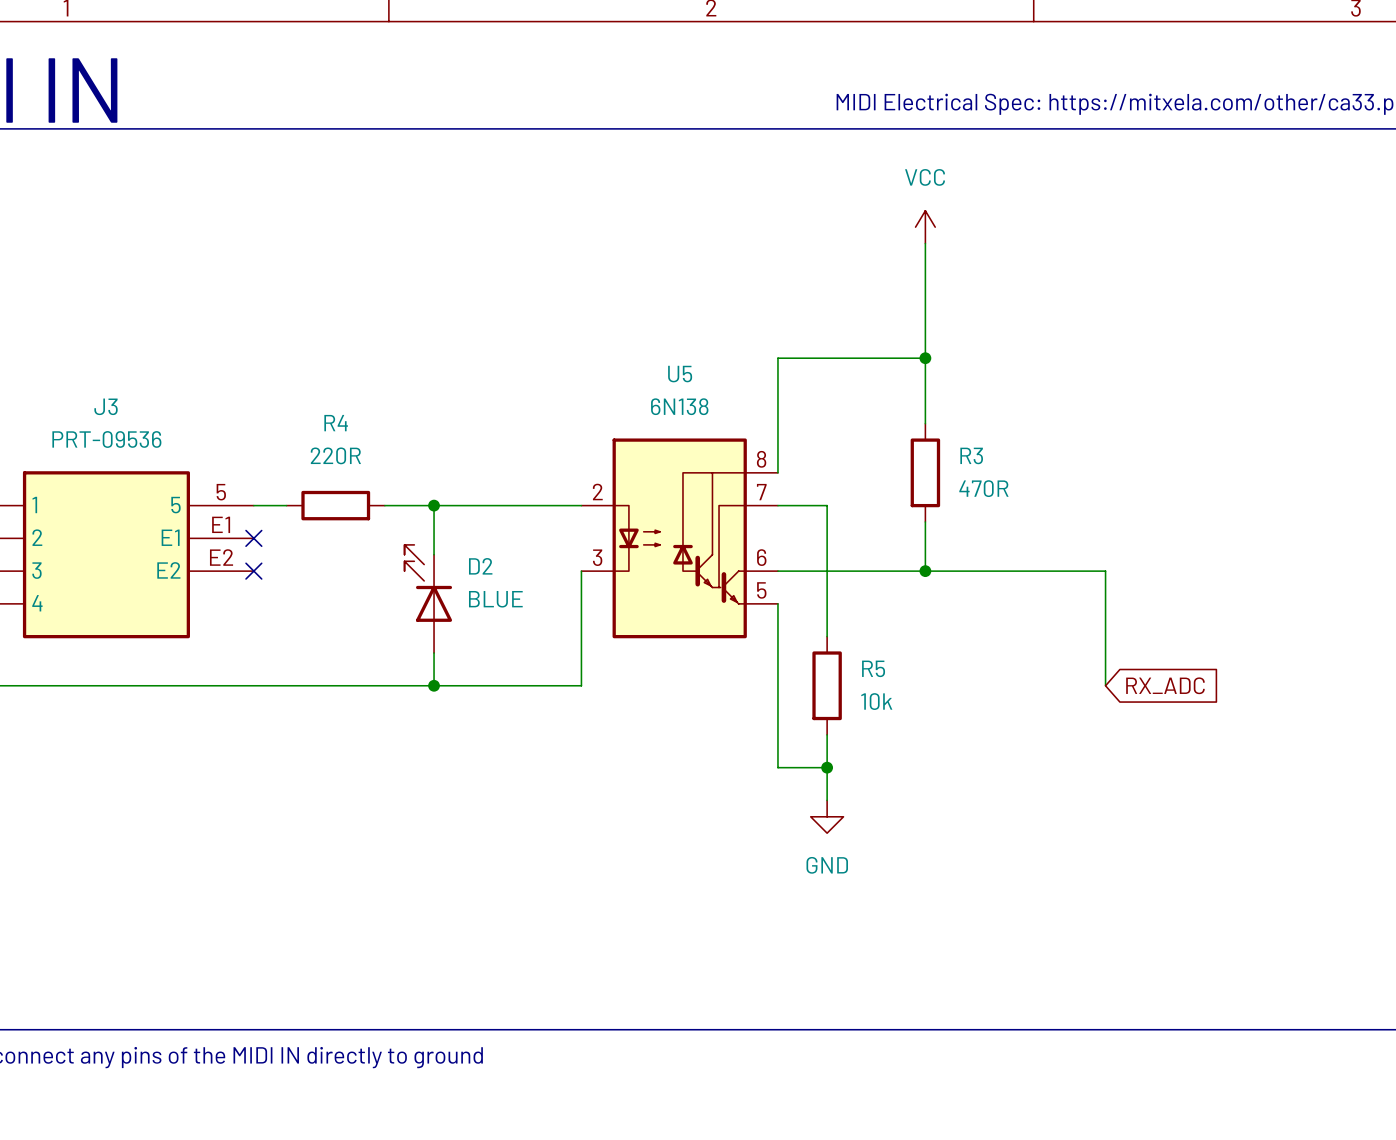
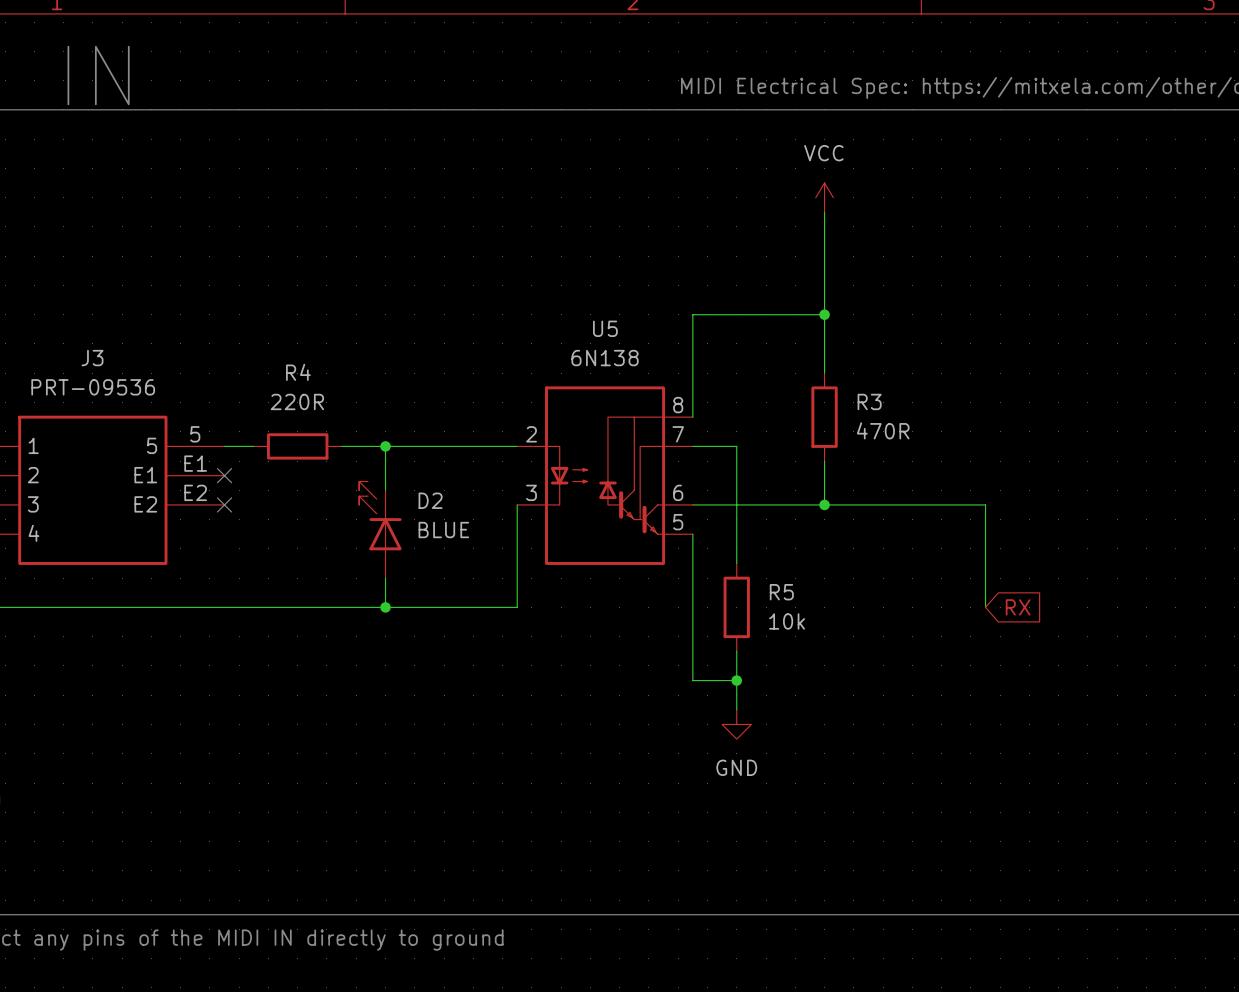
global label: RX_ADC (1165, 685) -> RX (1018, 607)

